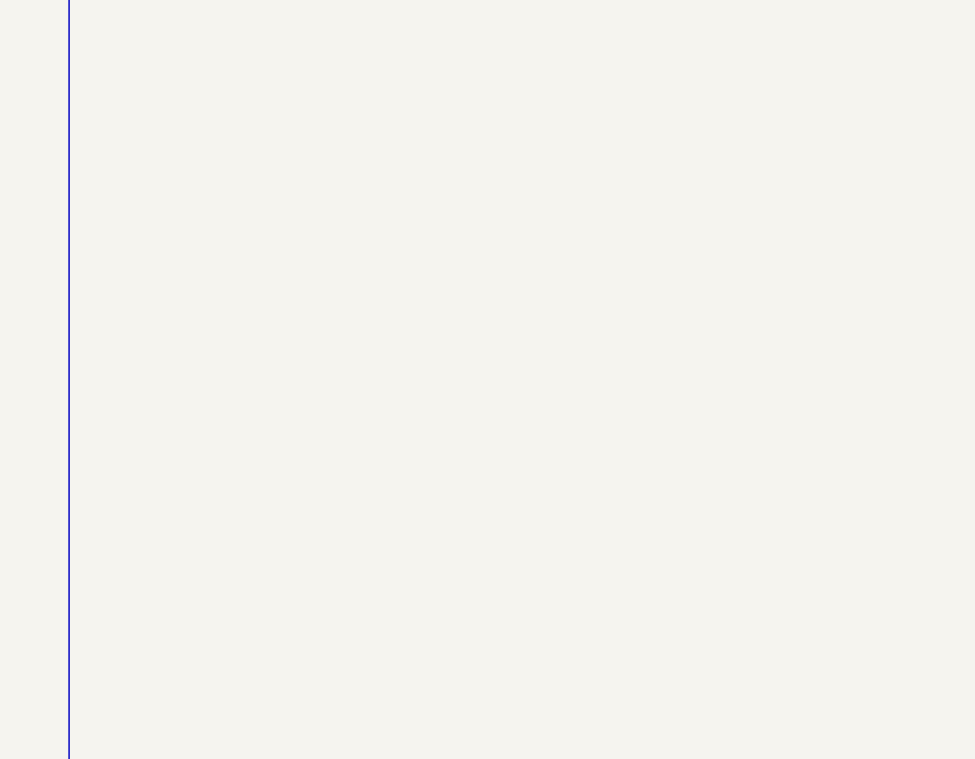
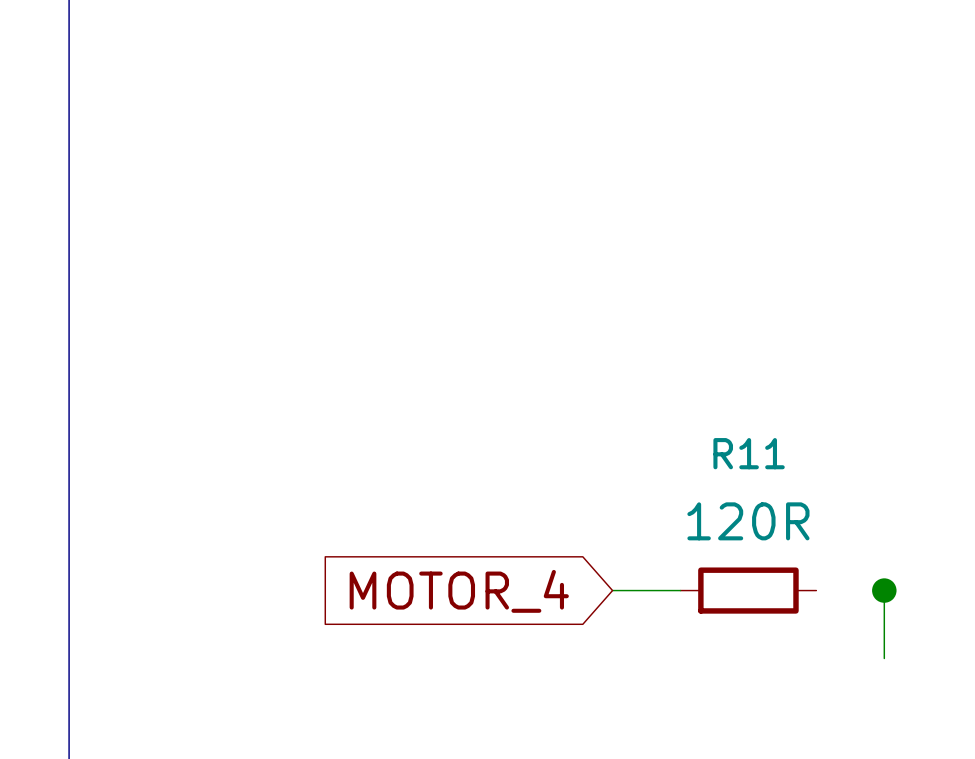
wire: none -> (612, 590) (680, 590)
R11: none -> 120R (748, 590)
wire: none -> (884, 590) (884, 658)
junction: none -> (884, 590)
global label: none -> MOTOR_4 (459, 591)

